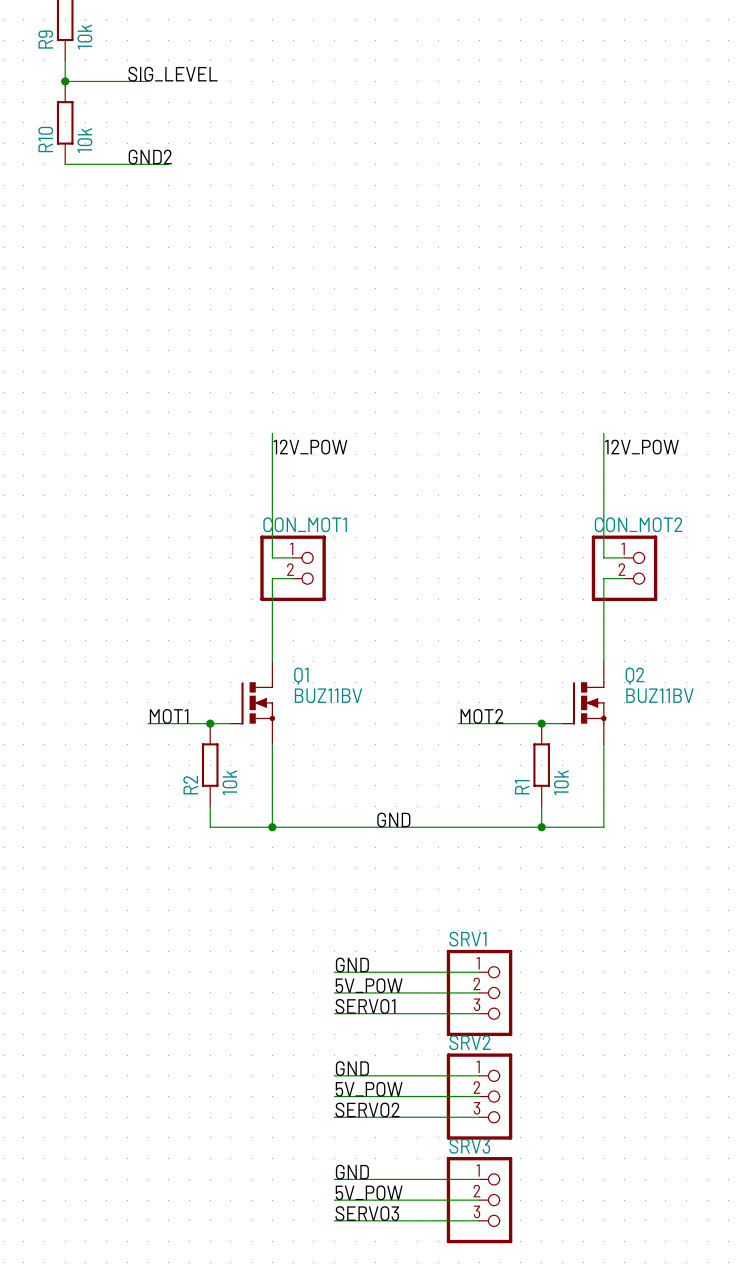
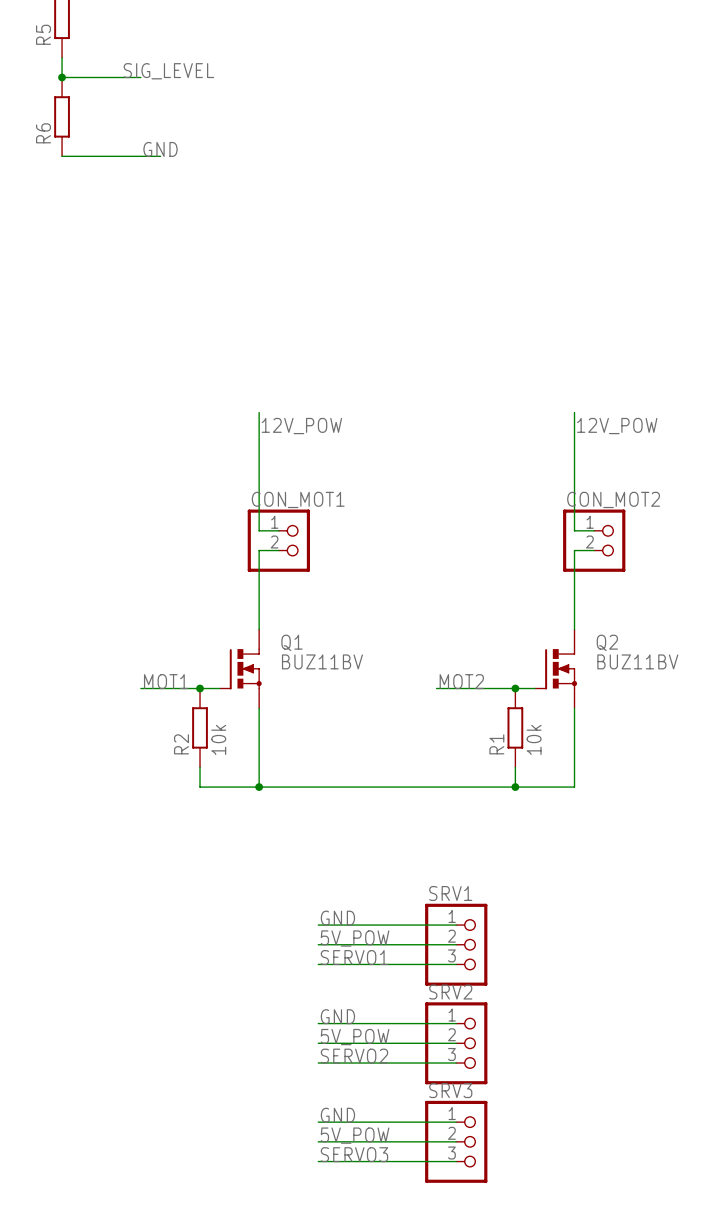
R9 value: 10k (84, 36) -> none
R9 name: R9 (45, 39) -> R5 (43, 34)
R10 name: R10 (45, 139) -> R6 (43, 133)
R10 value: 10k (84, 140) -> none
label: GND2 (150, 157) -> GND (160, 149)
label: GND (393, 819) -> none

